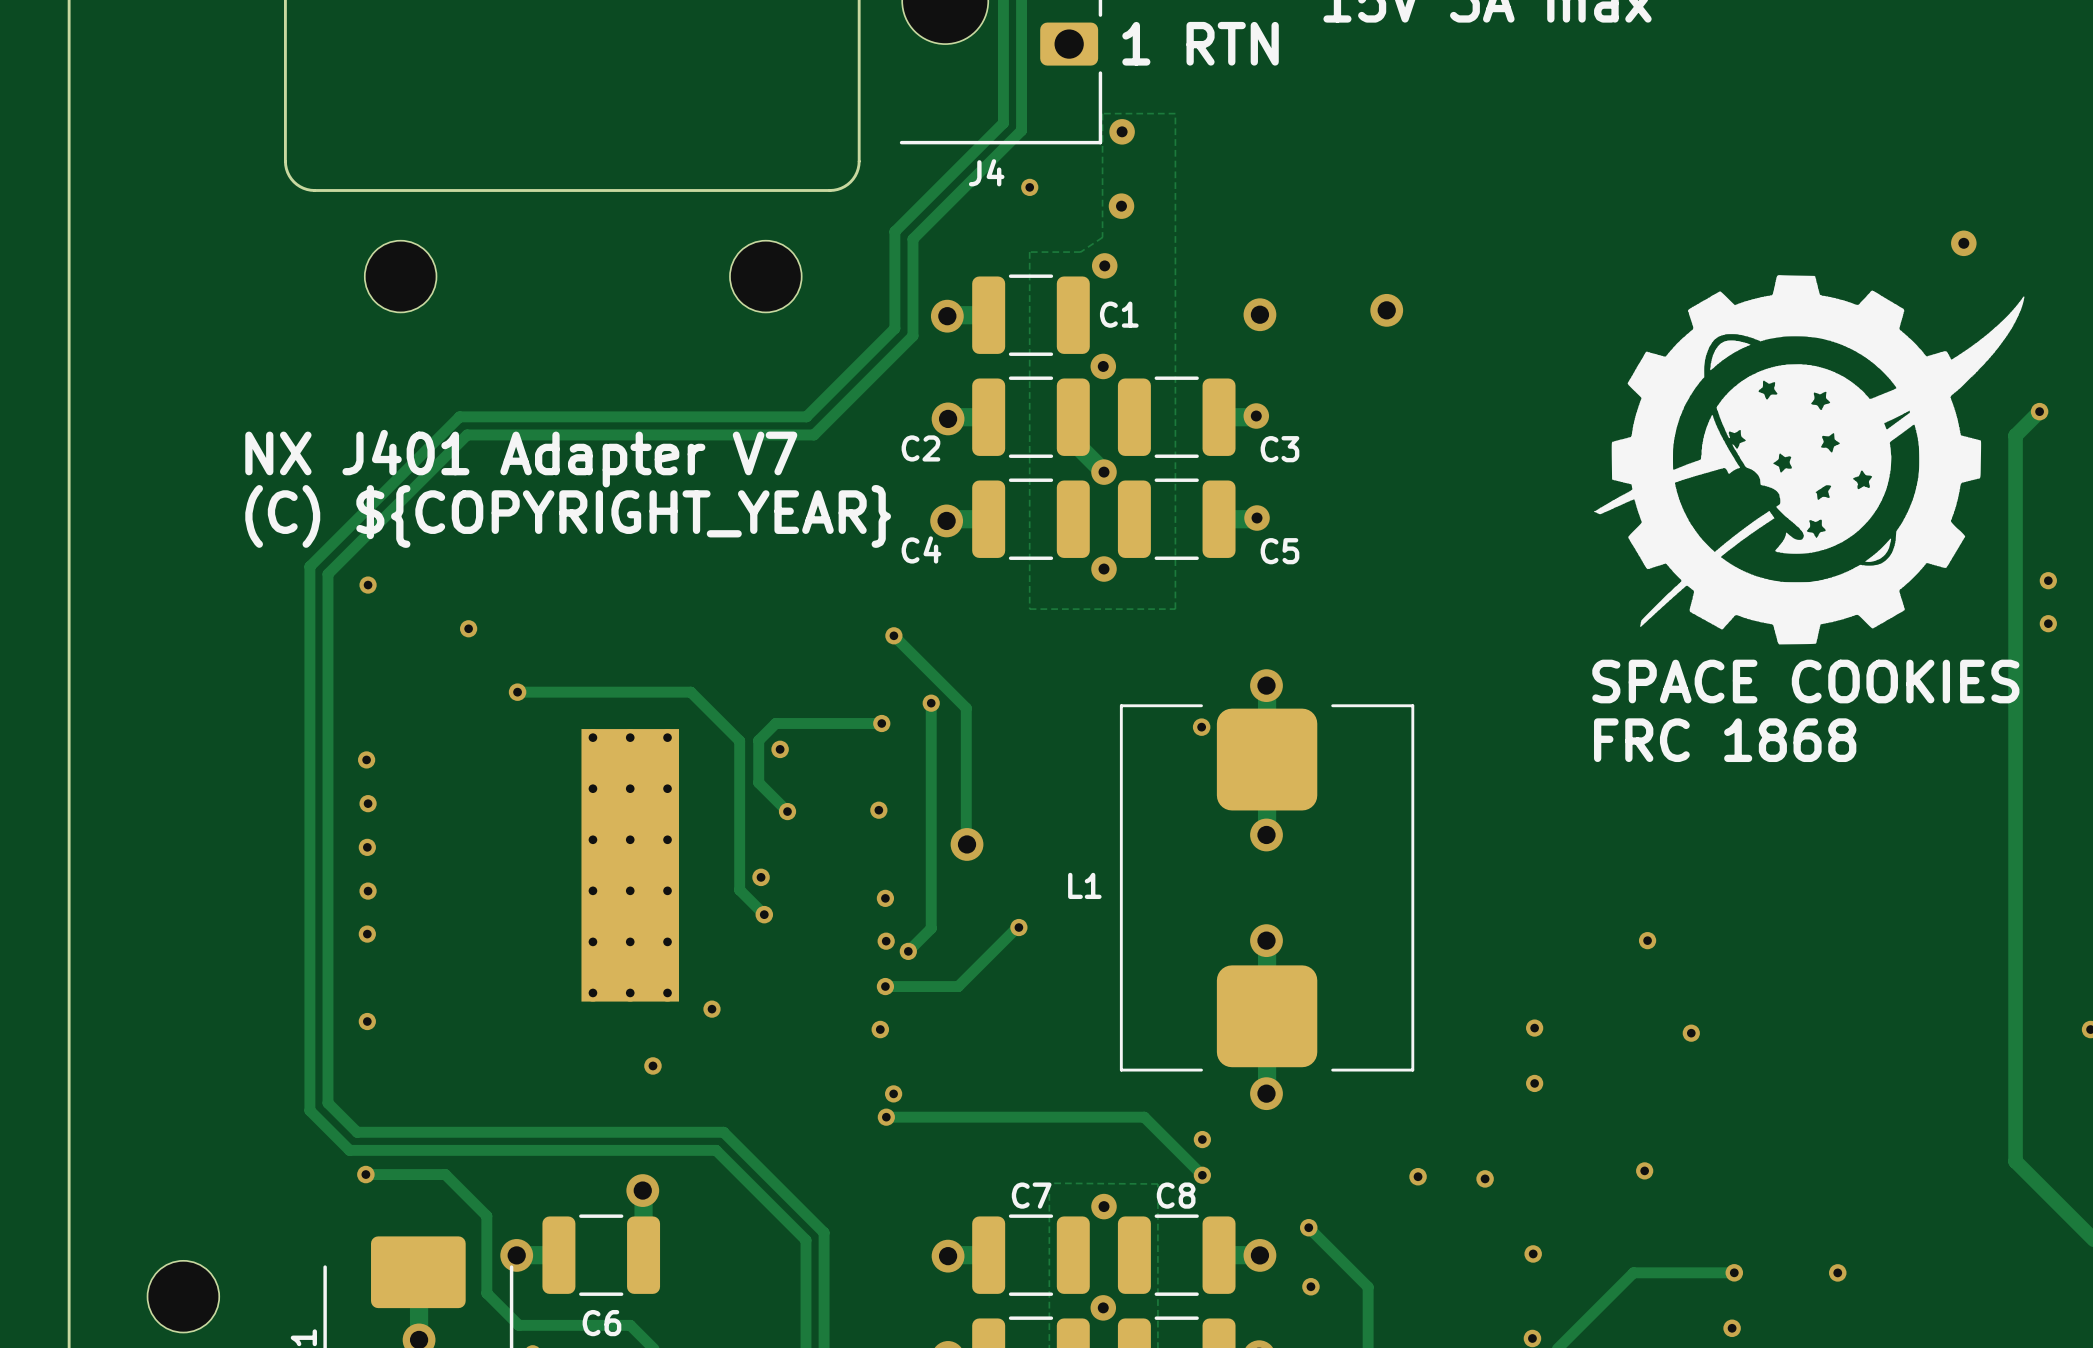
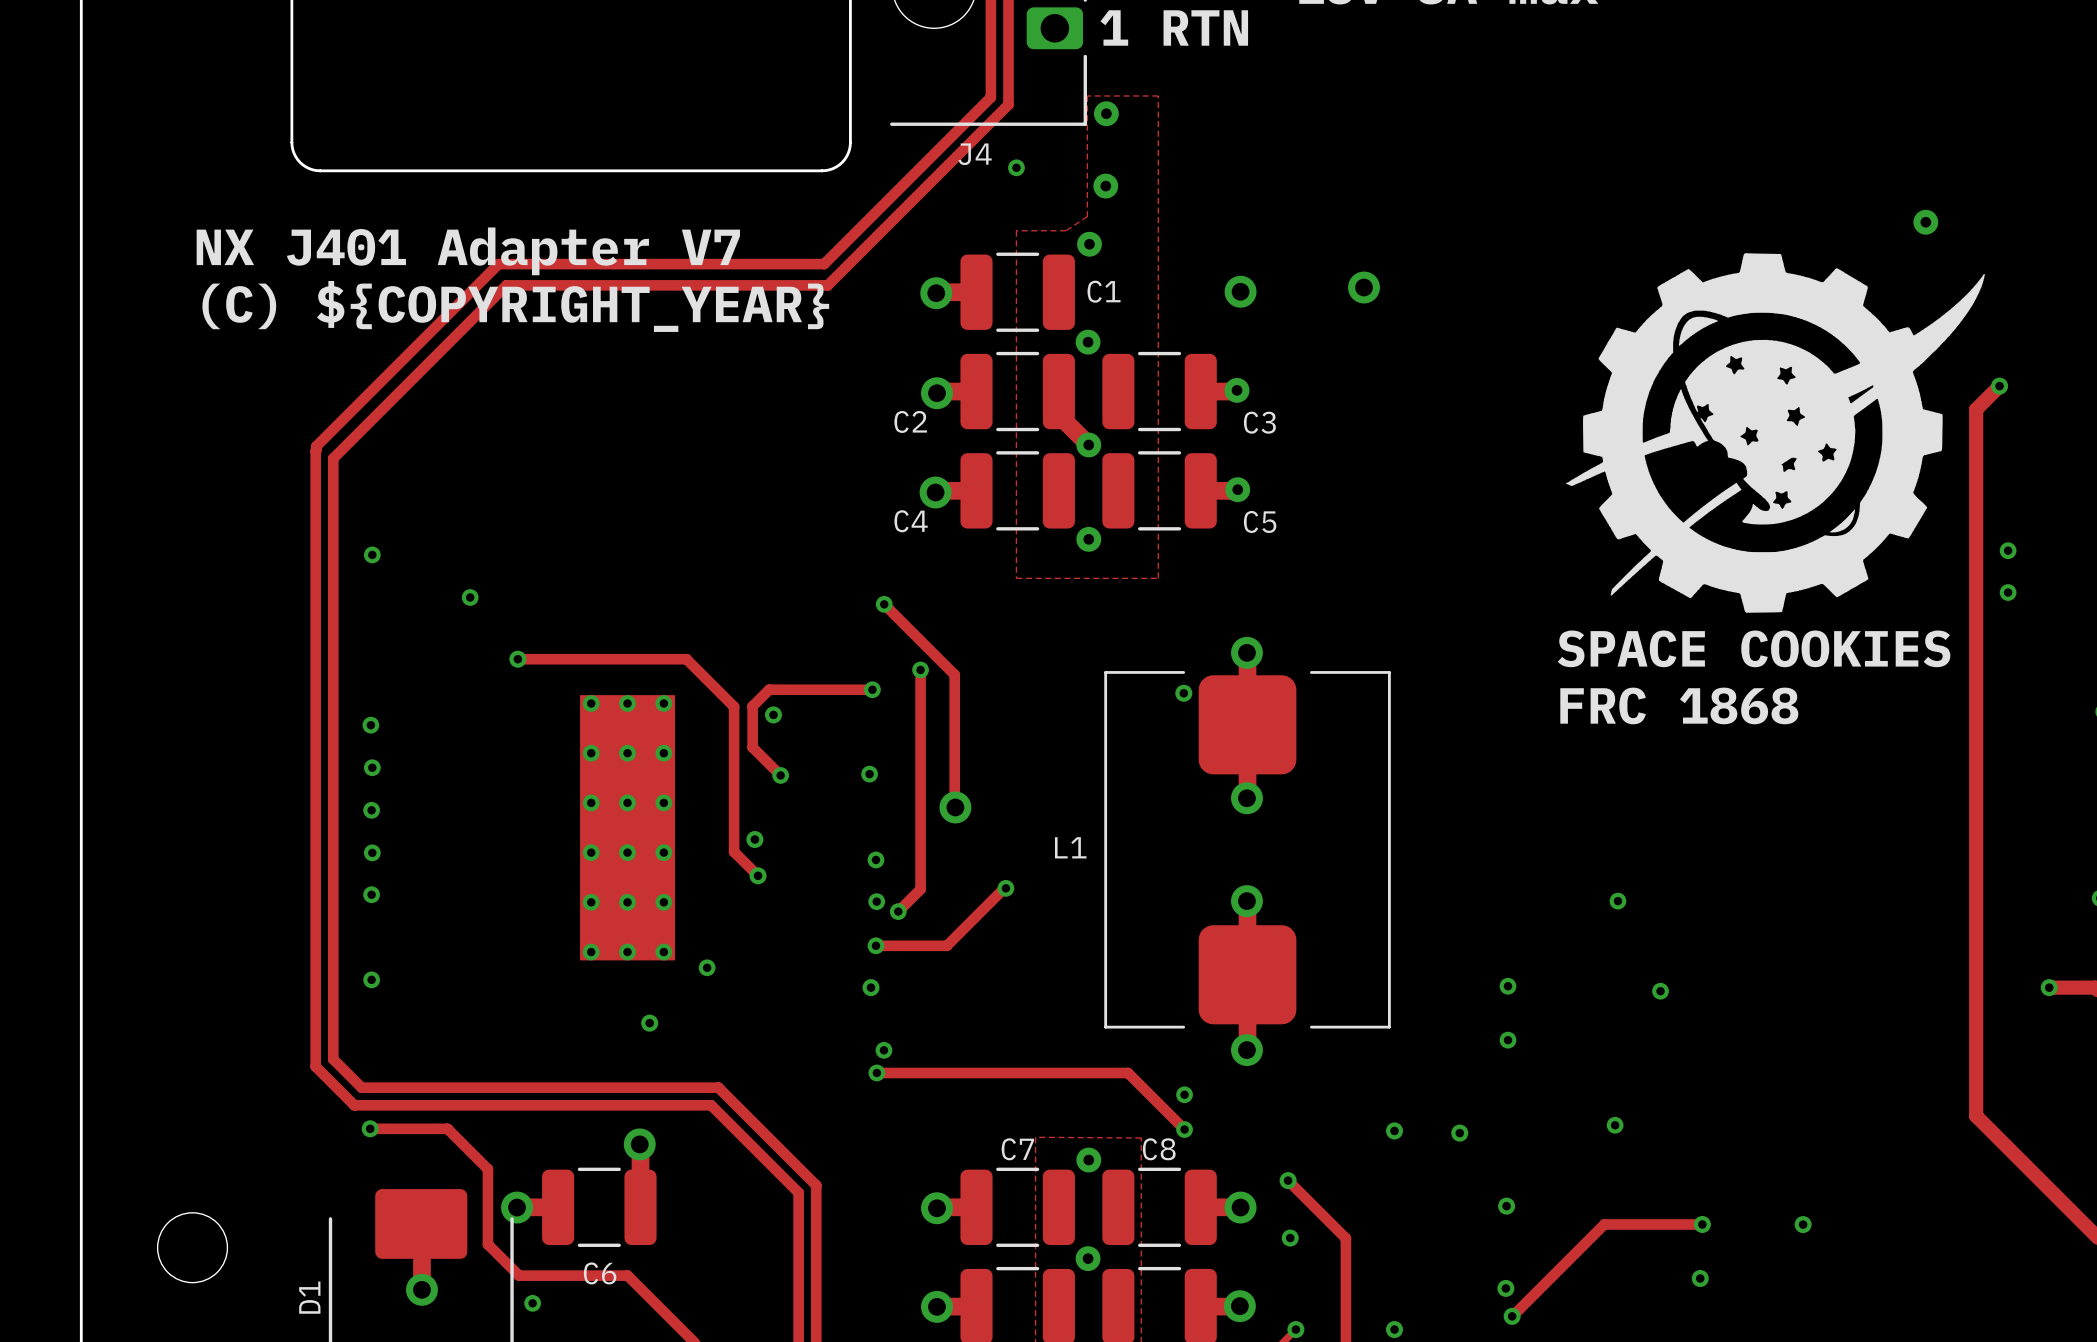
track: (1003, 115) (1003, 123) (894, 231) (894, 328) (806, 416) (459, 416) (309, 566) -> (990, 97) (824, 264) (498, 264) (316, 446) (315, 537)
track: (1021, 122) (1021, 130) (912, 239) (912, 335) (814, 434) (467, 434) (327, 574) -> (1008, 104) (827, 285) (506, 285) (333, 458) (333, 544)
part: (400, 276) -> none
part: (765, 276) -> none
text position: NX J401 Adapter V7 (521, 458) -> NX J401 Adapter V7 (468, 251)
text position: (C) ${COPYRIGHT_YEAR} (568, 516) -> (C) ${COPYRIGHT_YEAR} (515, 306)

